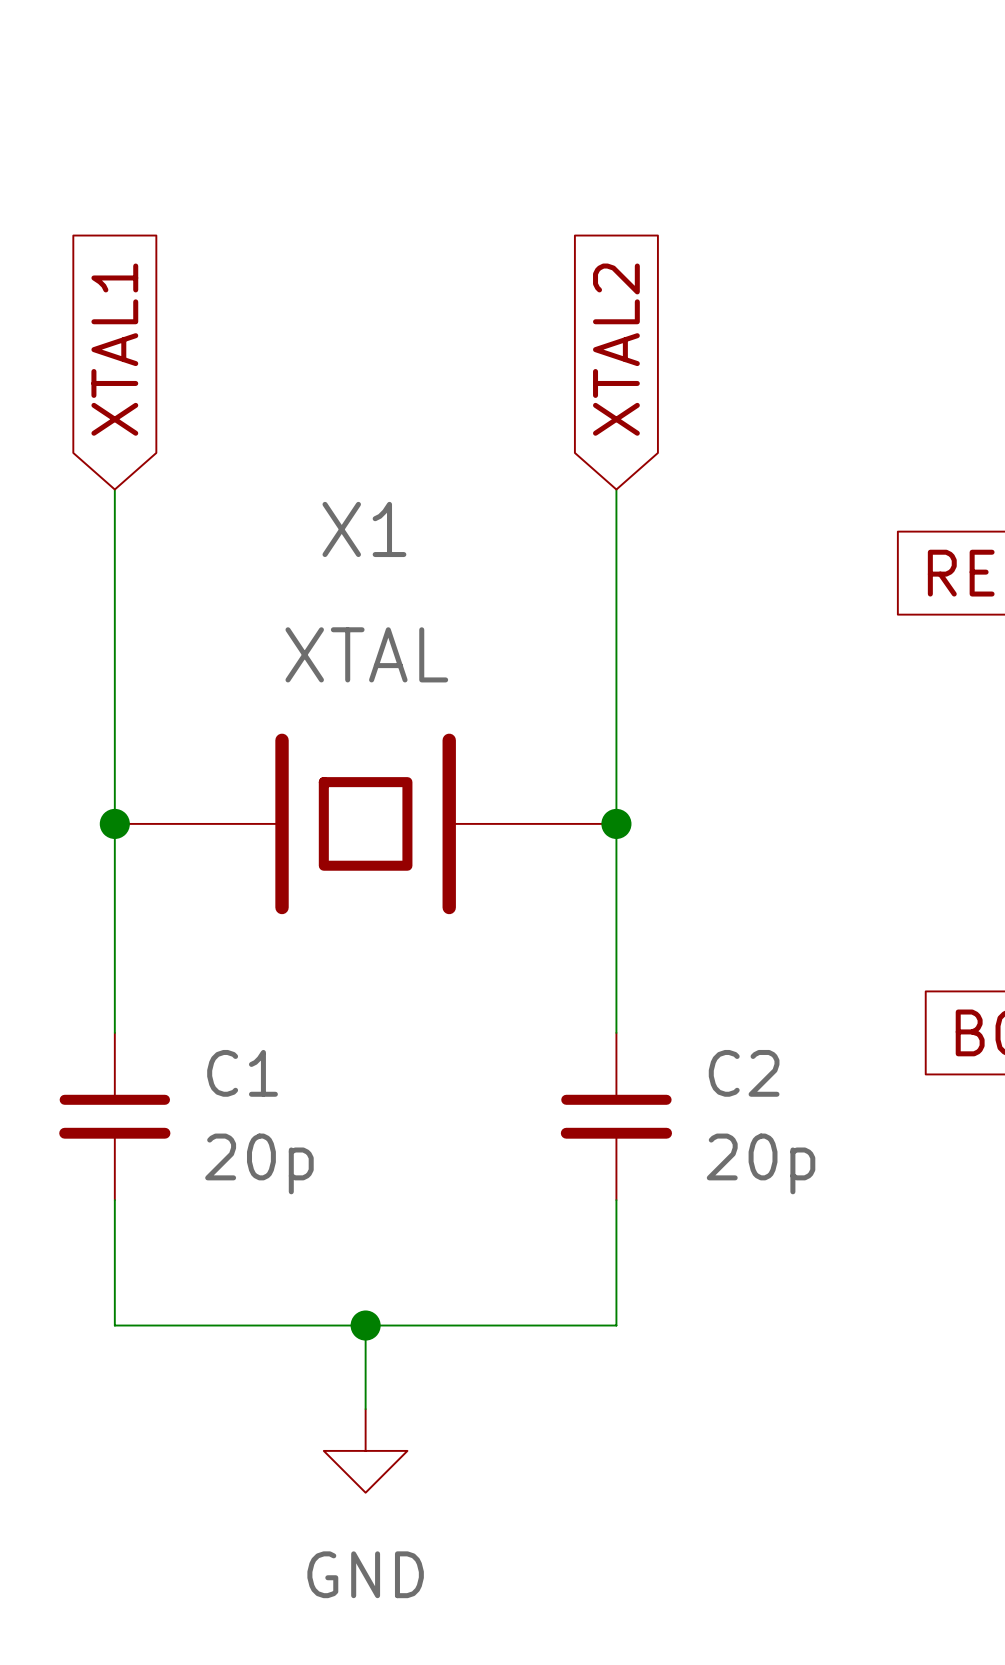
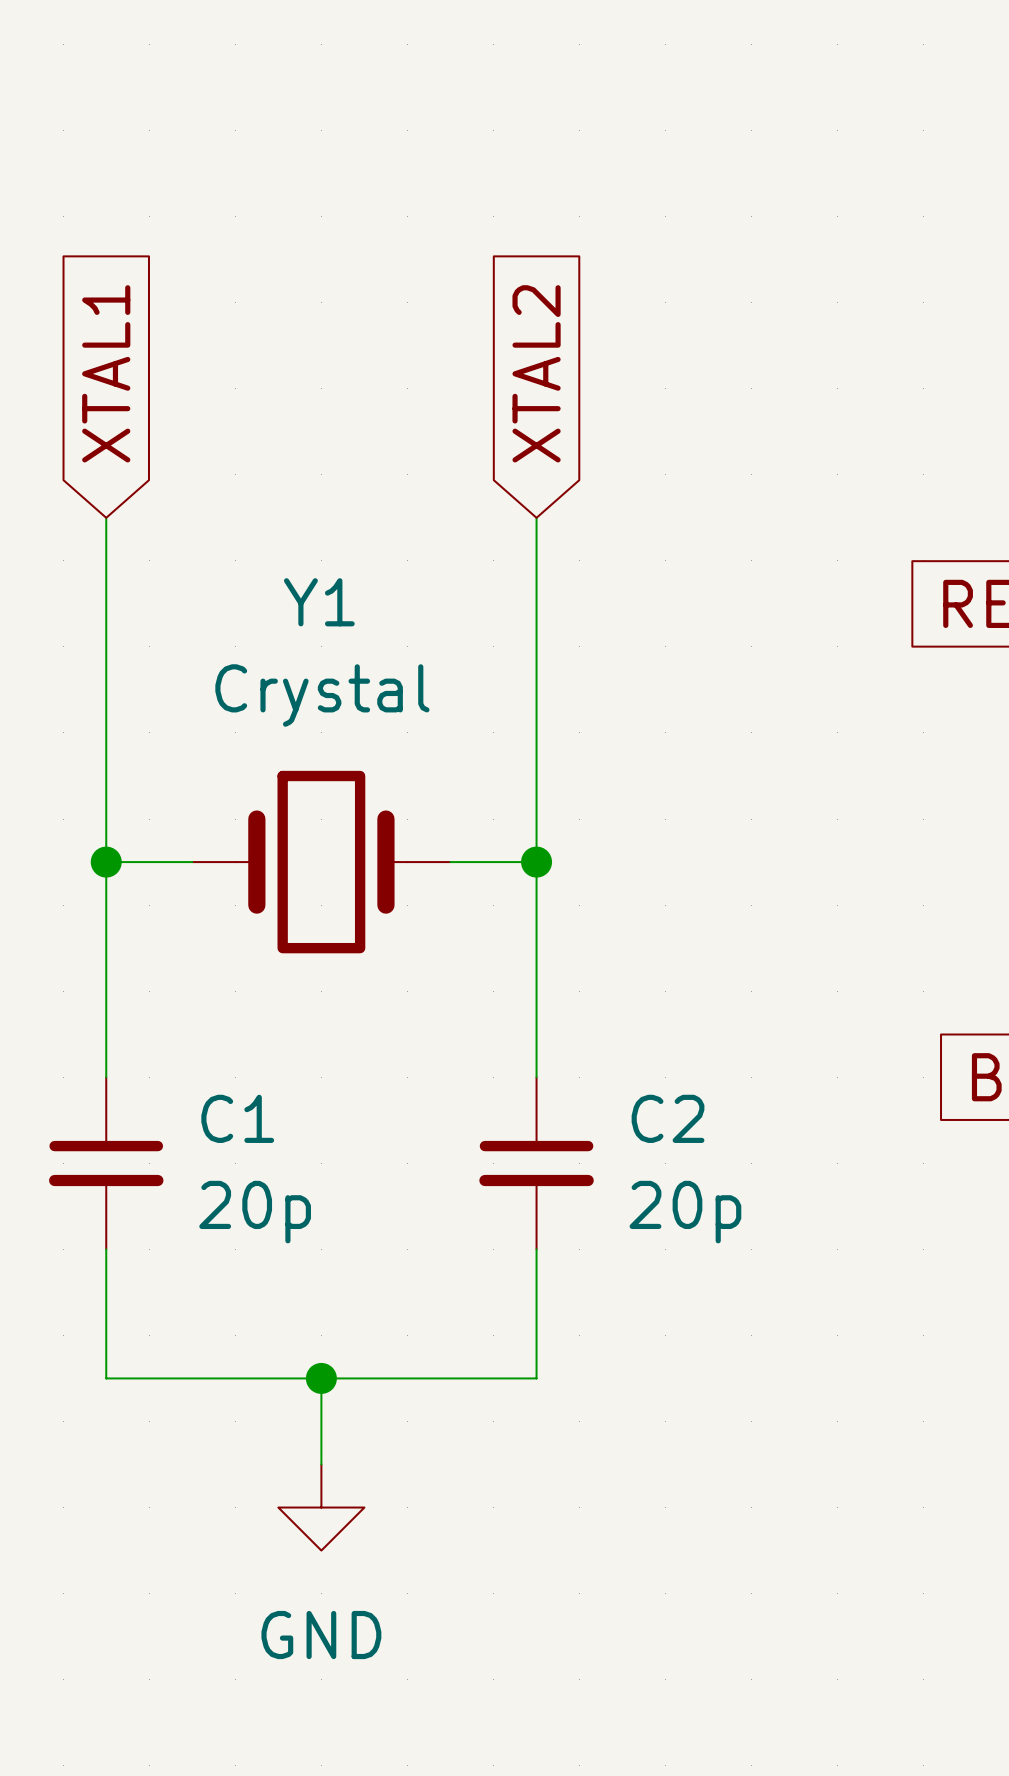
global label position: XTAL2 (616, 349) -> XTAL2 (536, 373)
wire: (616, 489) (616, 1032) -> (536, 517) (536, 1077)
Y1: none -> Crystal (321, 862)
X1: XTAL (365, 823) -> none
junction position: (616, 823) -> (536, 862)
C2 position: (616, 1116) -> (536, 1163)
wire: (616, 1200) (616, 1325) (532, 1325) -> (536, 1249) (536, 1378)
wire: (365, 1325) (365, 1409) -> (321, 1378) (321, 1464)
junction position: (365, 1325) -> (321, 1378)
power symbol position: GND (365, 1450) -> GND (321, 1507)

